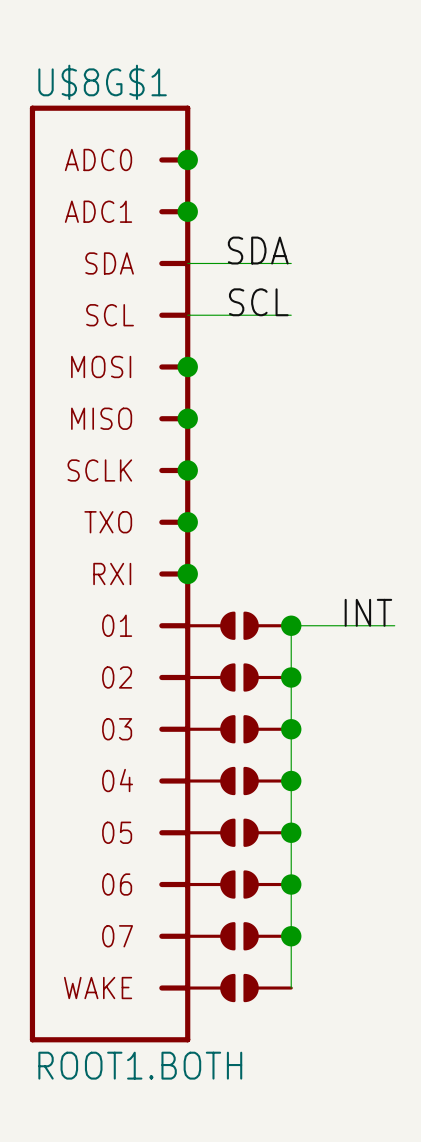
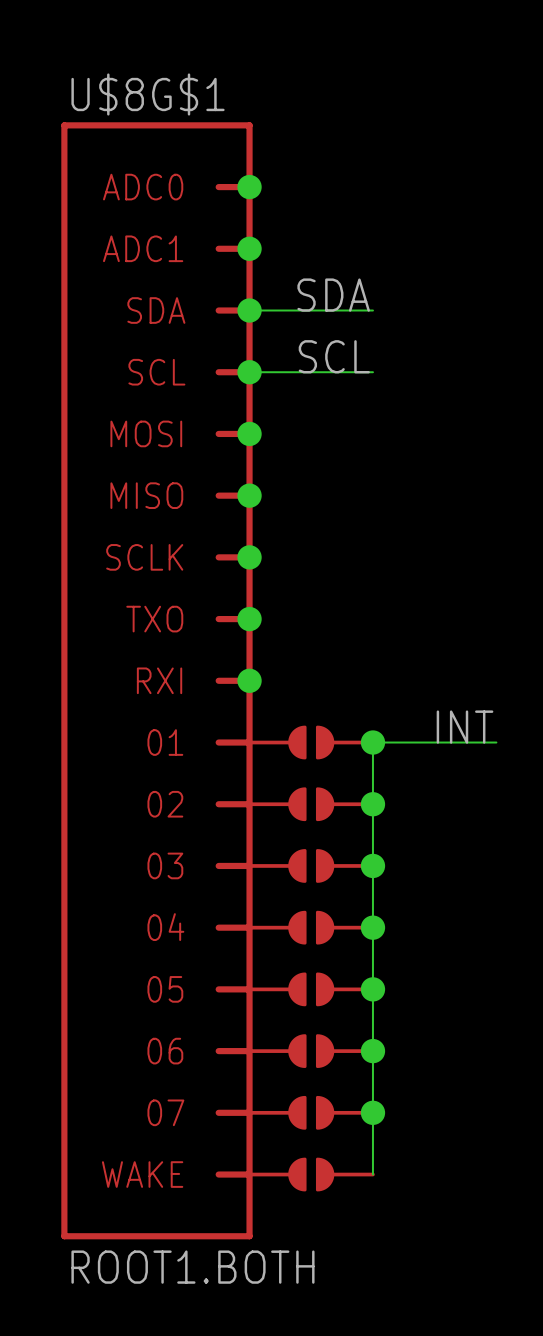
junction: none -> (249, 310)
junction: none -> (249, 372)

